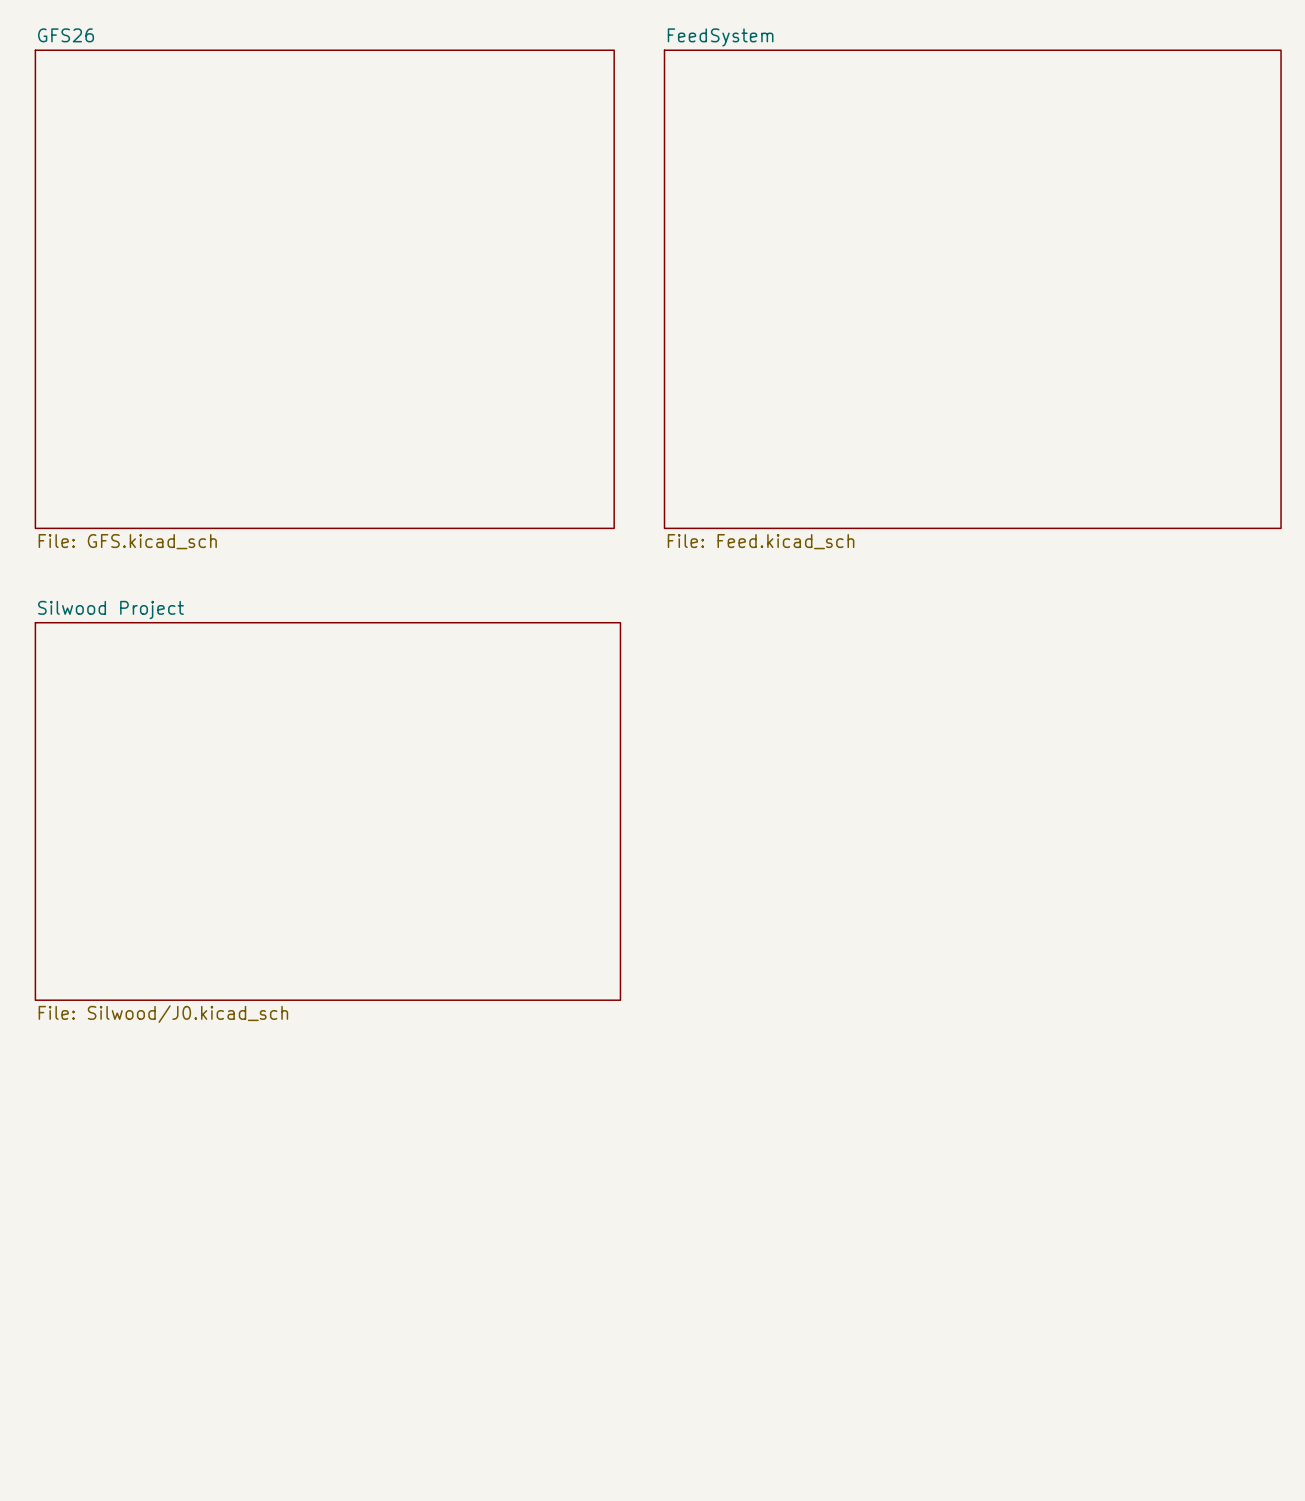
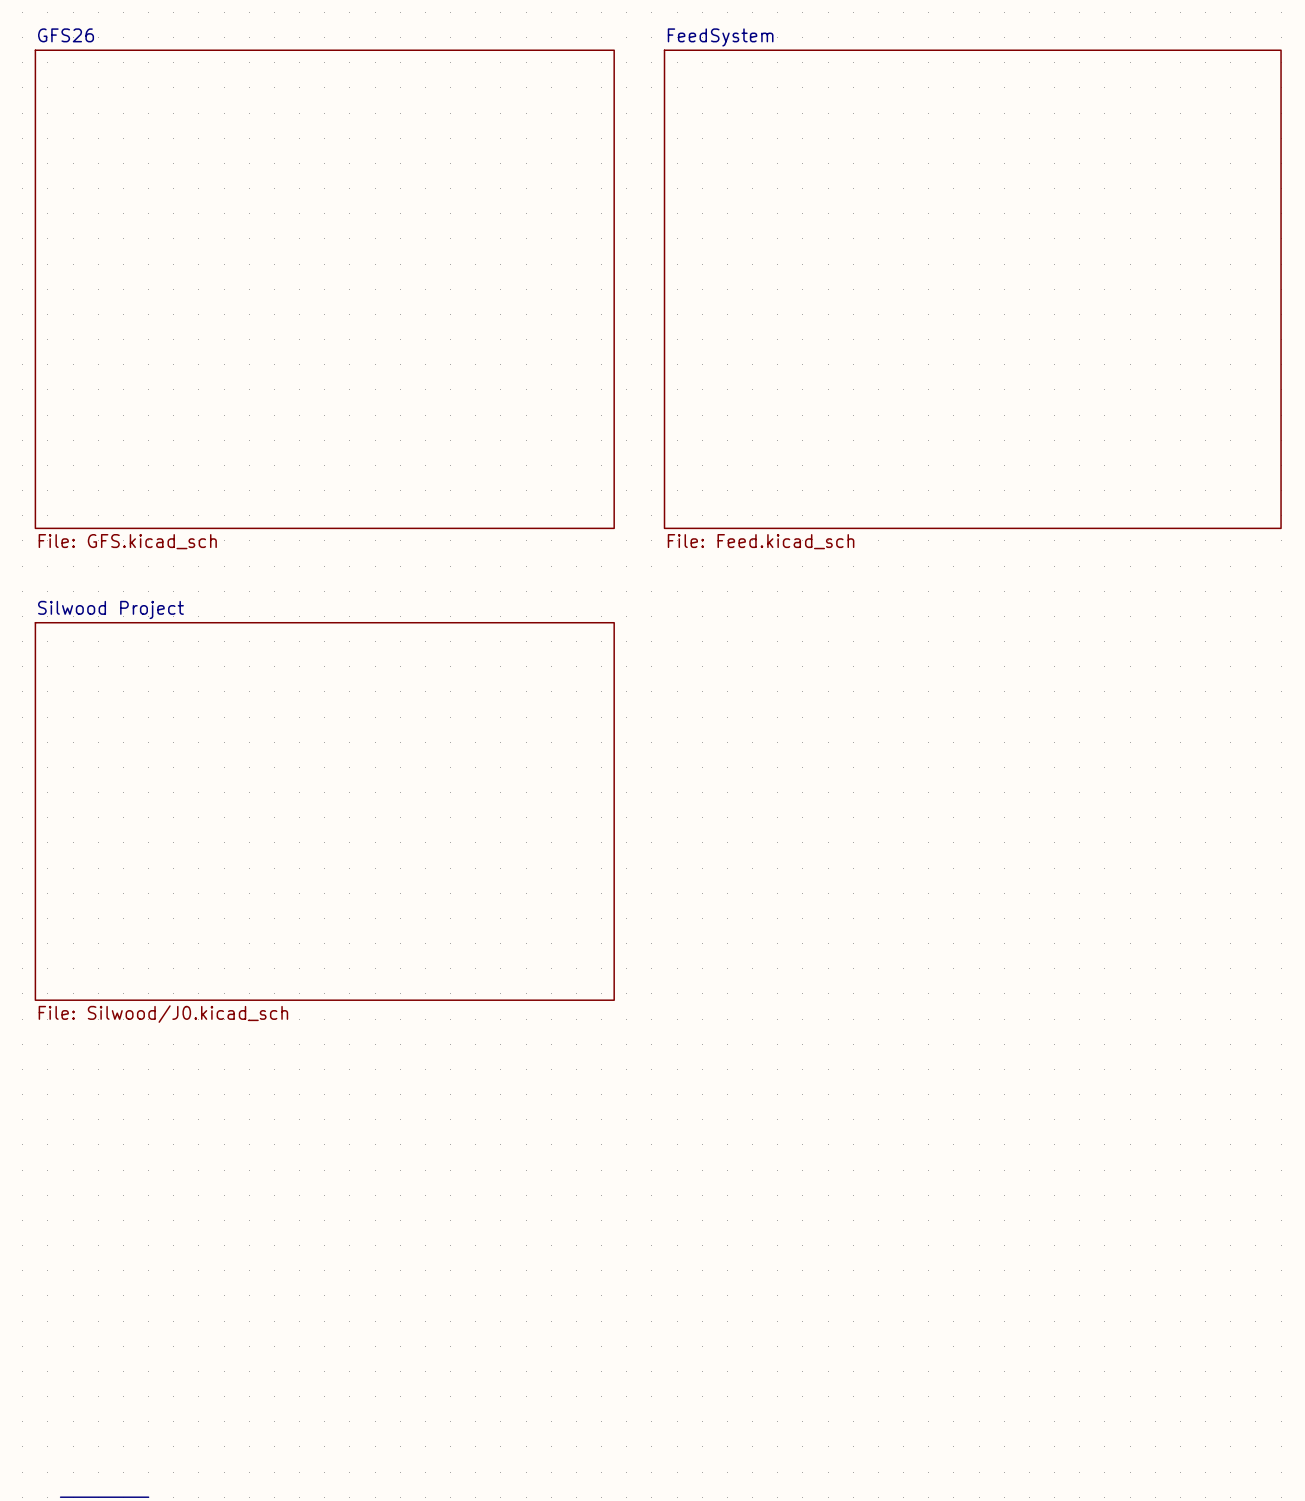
sheet Silwood Project shape: [34, 621, 622, 1001] -> [34, 621, 615, 1001]
wire: none -> (60, 1497) (148, 1497)

